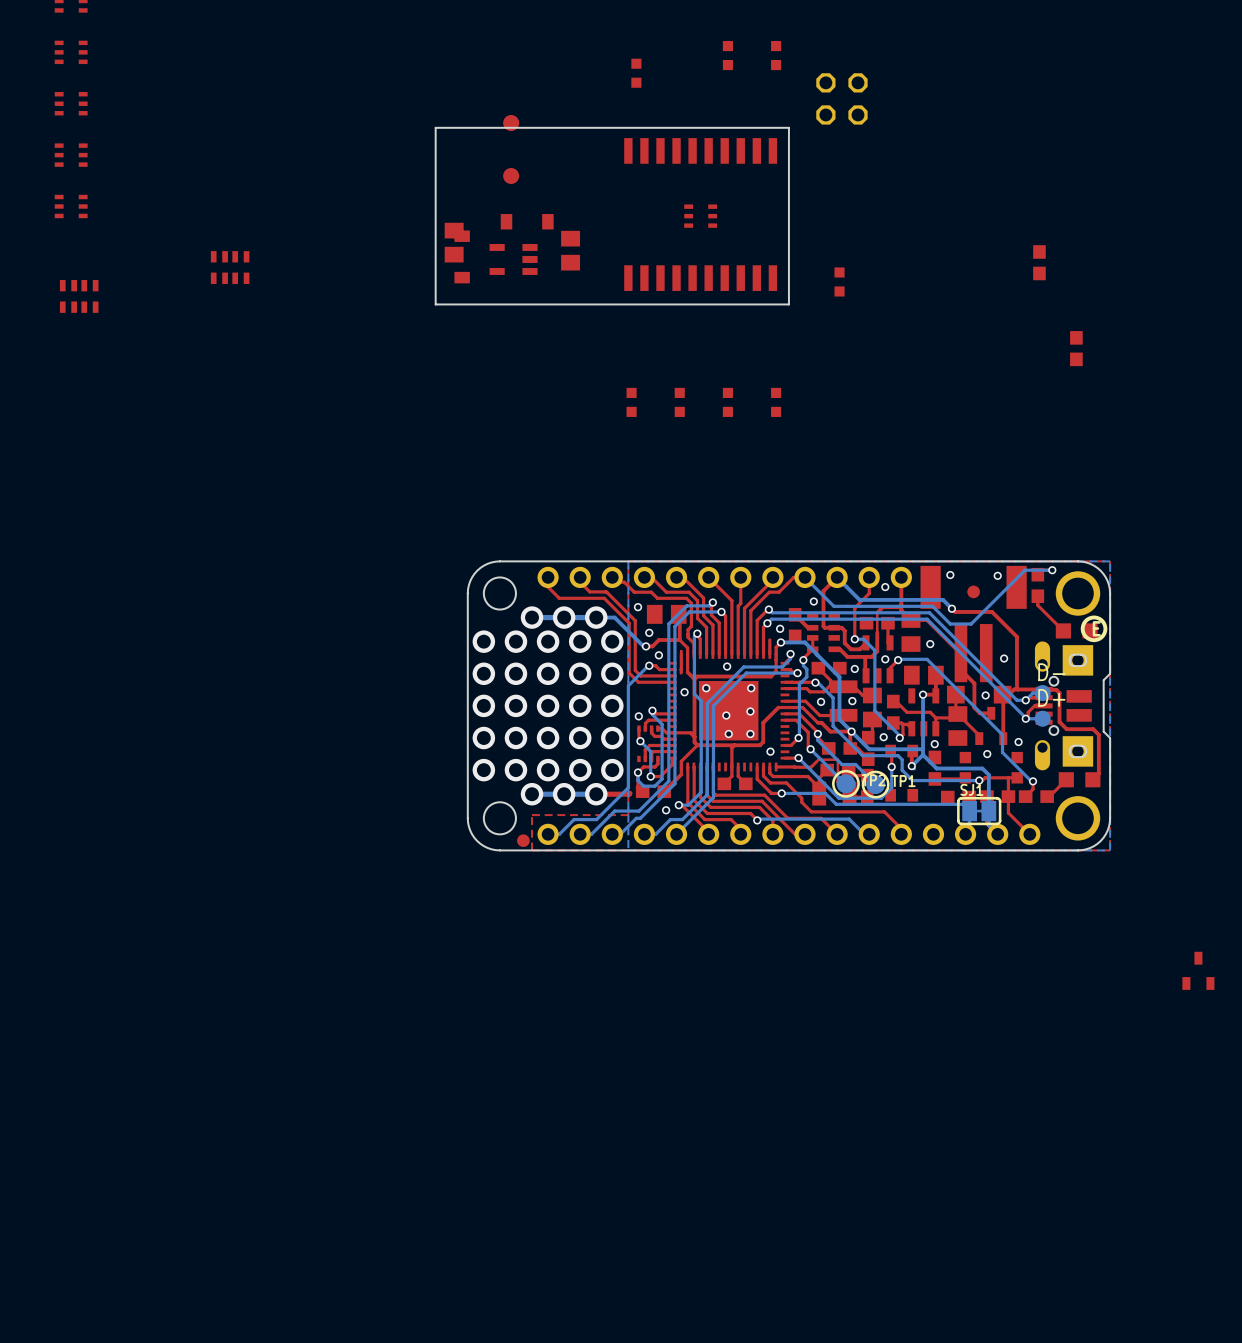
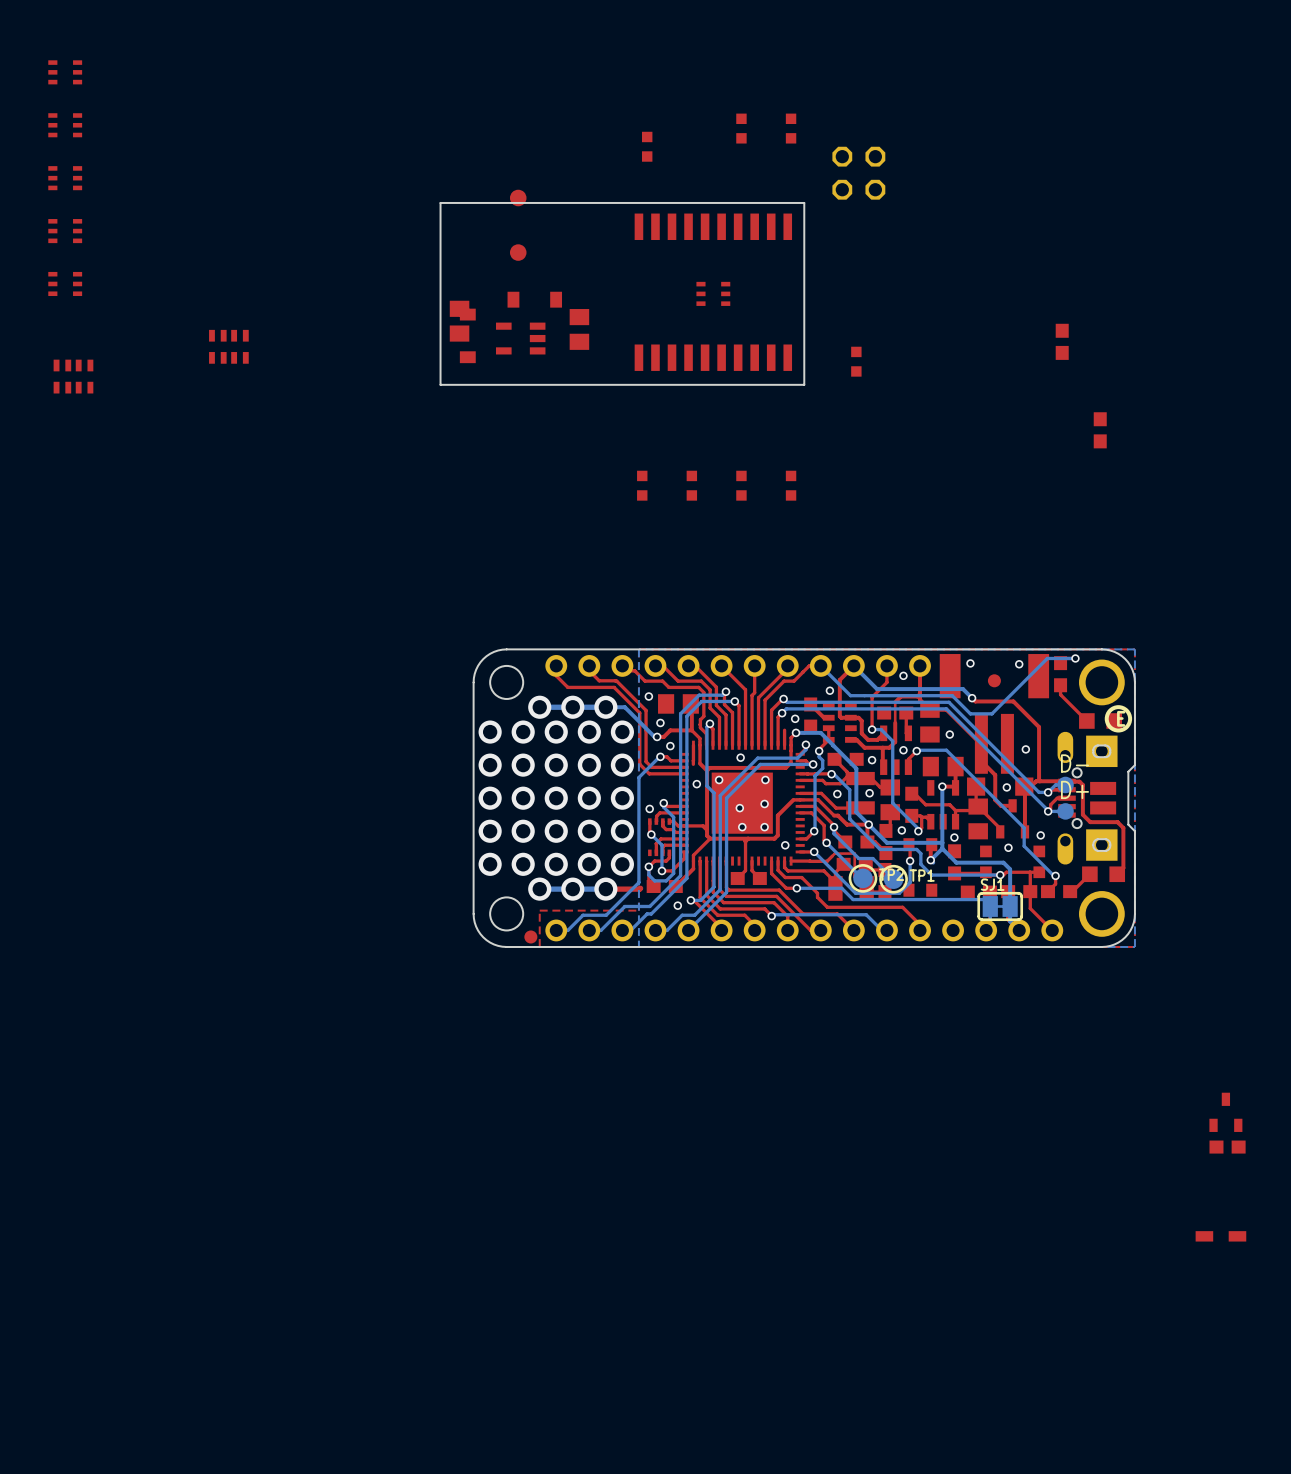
part position: (1198, 970) -> (1225, 1112)
part: none -> (1227, 1147)
part: none -> (1220, 1236)

